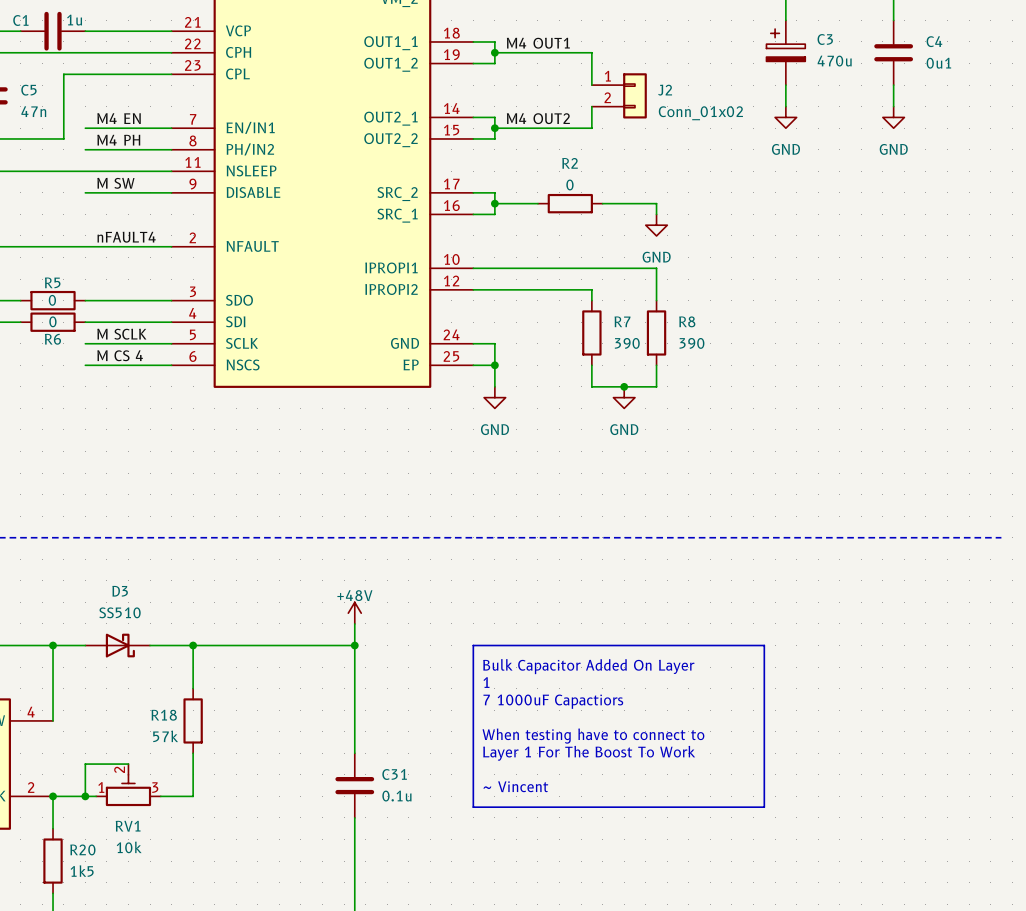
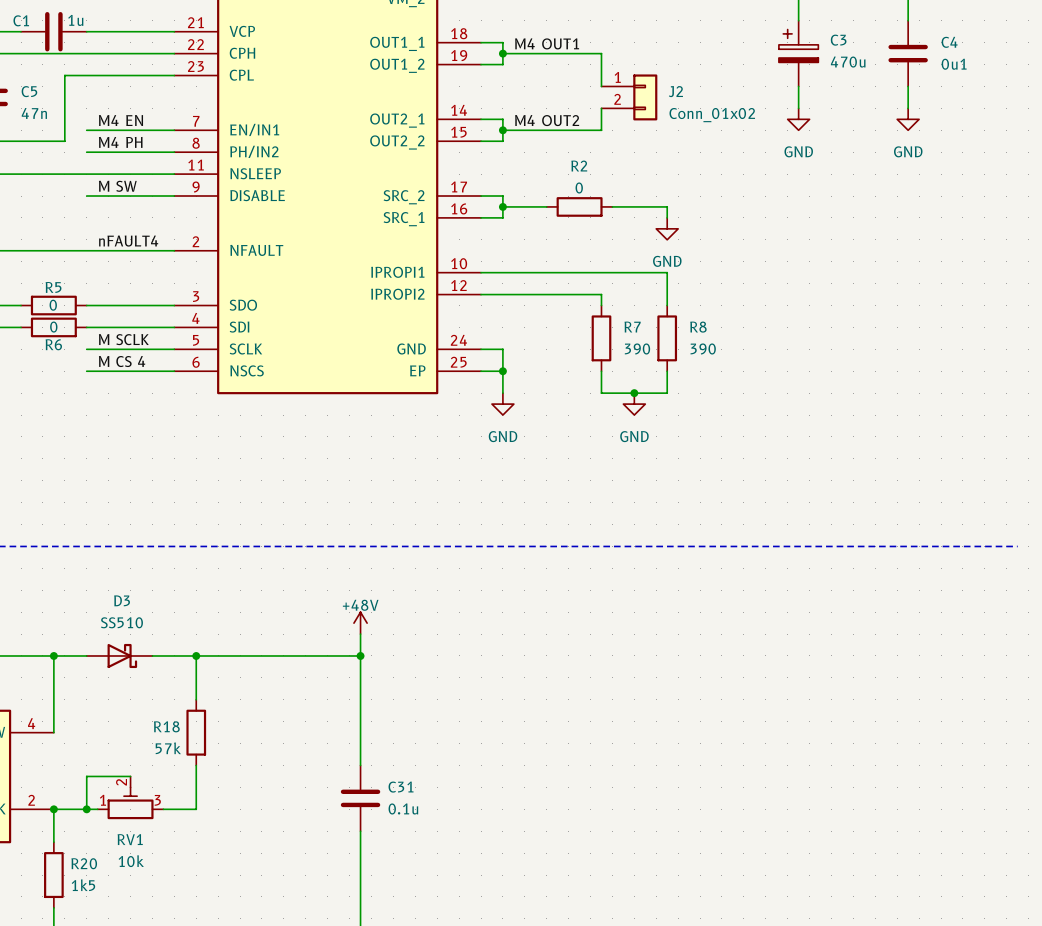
line: (473, 645) (764, 645) (764, 807) (473, 807) (473, 645) -> none
text: Bulk Capacitor Added On Layer (588, 666) -> none
text: 1 (486, 682) -> none
text: 7 1000uF Capactiors (553, 701) -> none
text: When testing have to connect to (593, 736) -> none
text: Layer 1 For The Boost To Work (589, 753) -> none
text: ~ Vincent (515, 786) -> none

